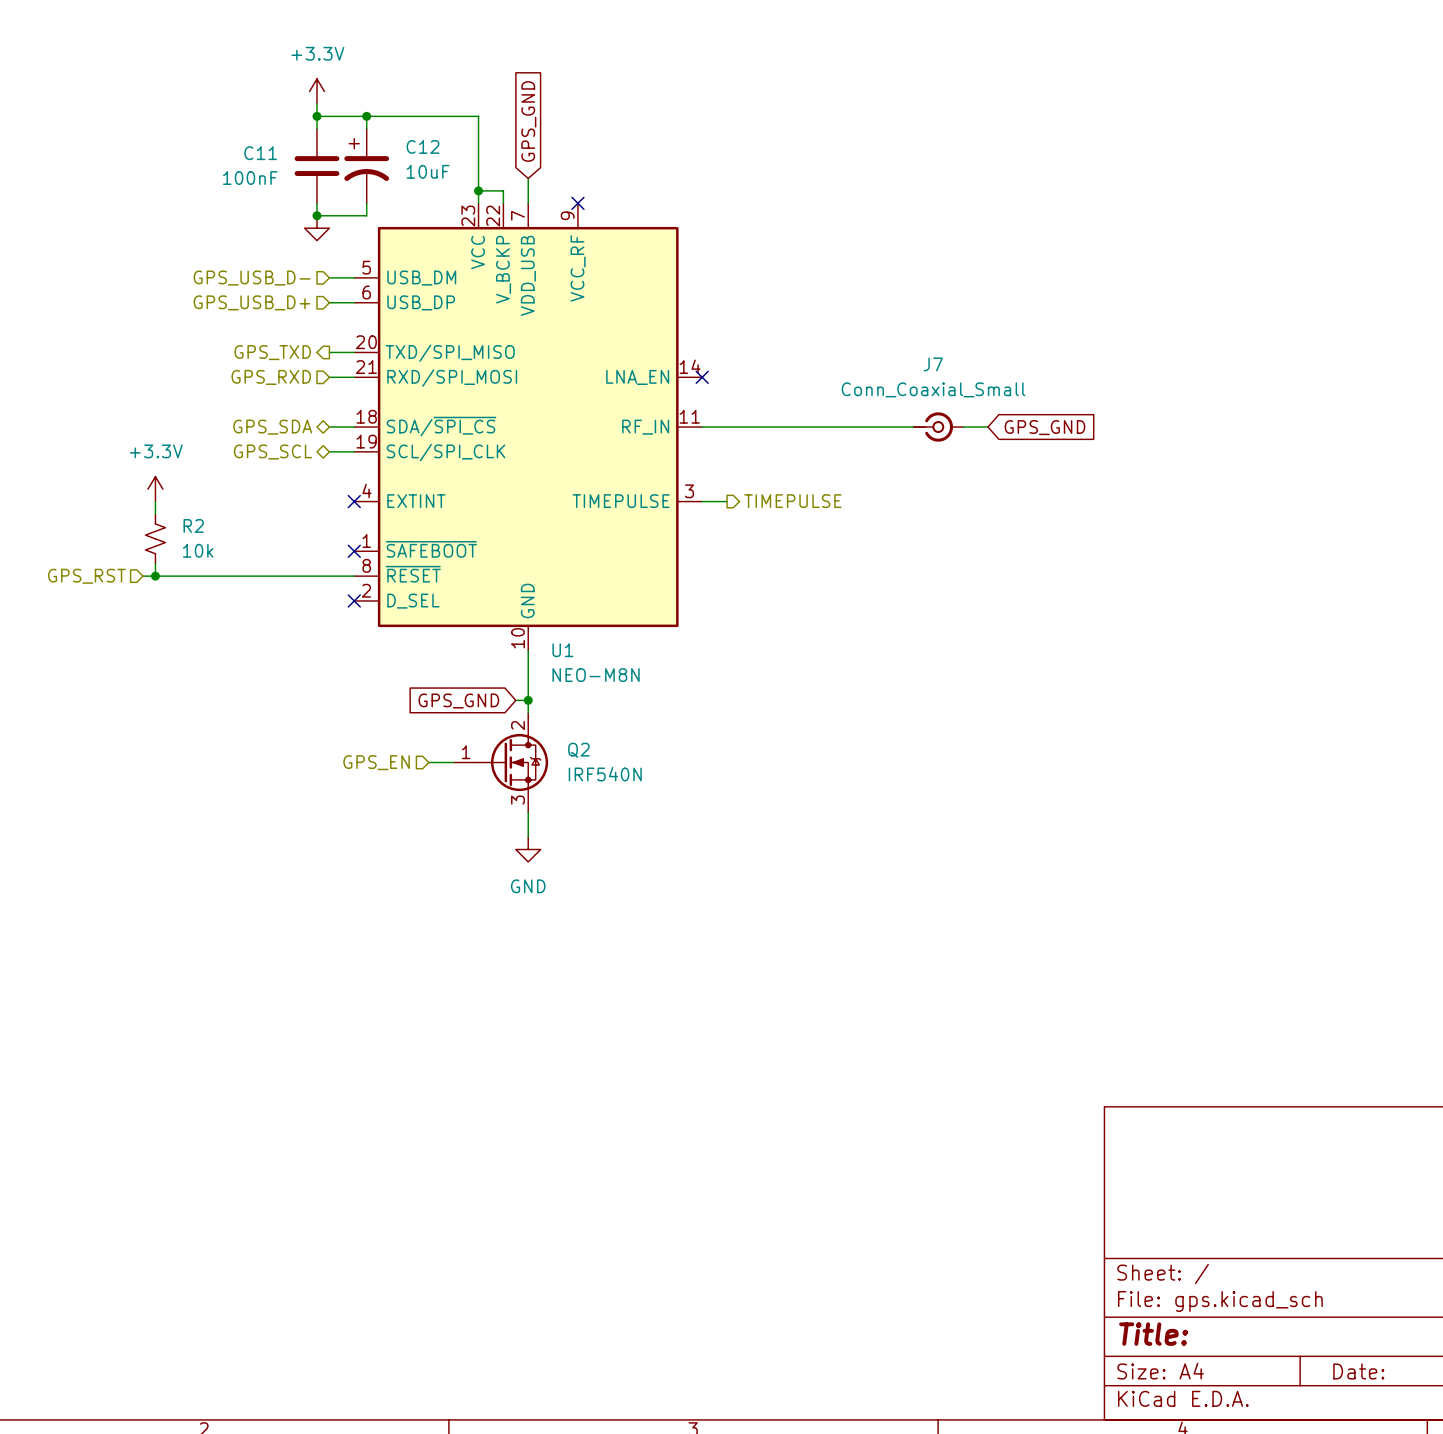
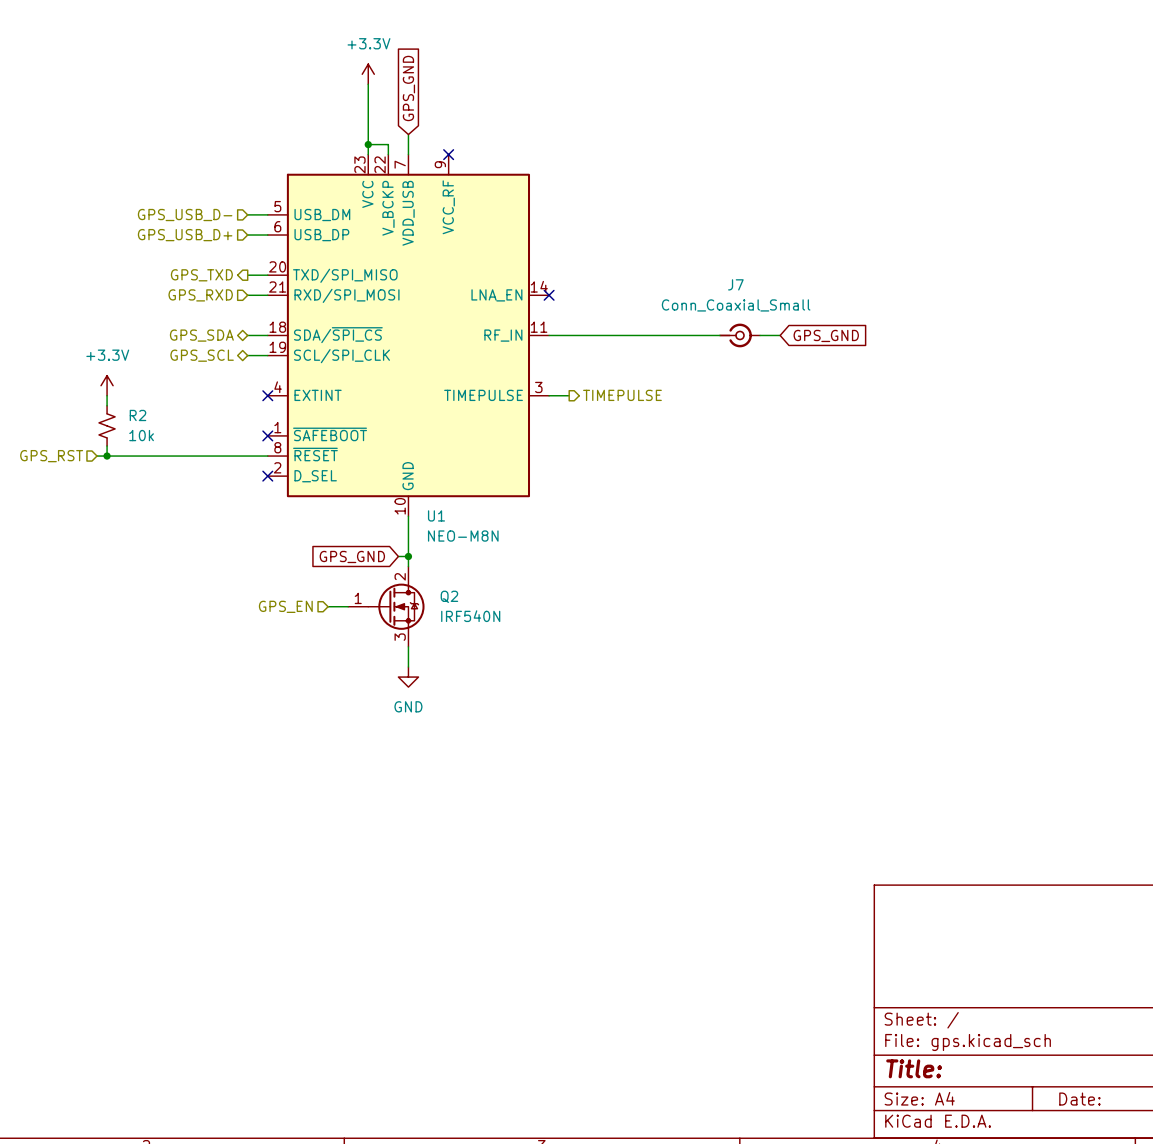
power symbol position: +3.3V (316, 91) -> +3.3V (368, 74)
wire: (316, 103) (316, 128) -> none
wire: (316, 116) (478, 116) -> none
junction: (316, 116) -> none
wire: (366, 116) (366, 128) -> none
junction: (366, 116) -> none
C11: 100nF (316, 166) -> none
C12: 10uF (366, 166) -> none
wire: (316, 203) (316, 215) (366, 215) (366, 203) -> none
junction: (316, 215) -> none
power symbol: (316, 228) -> none

